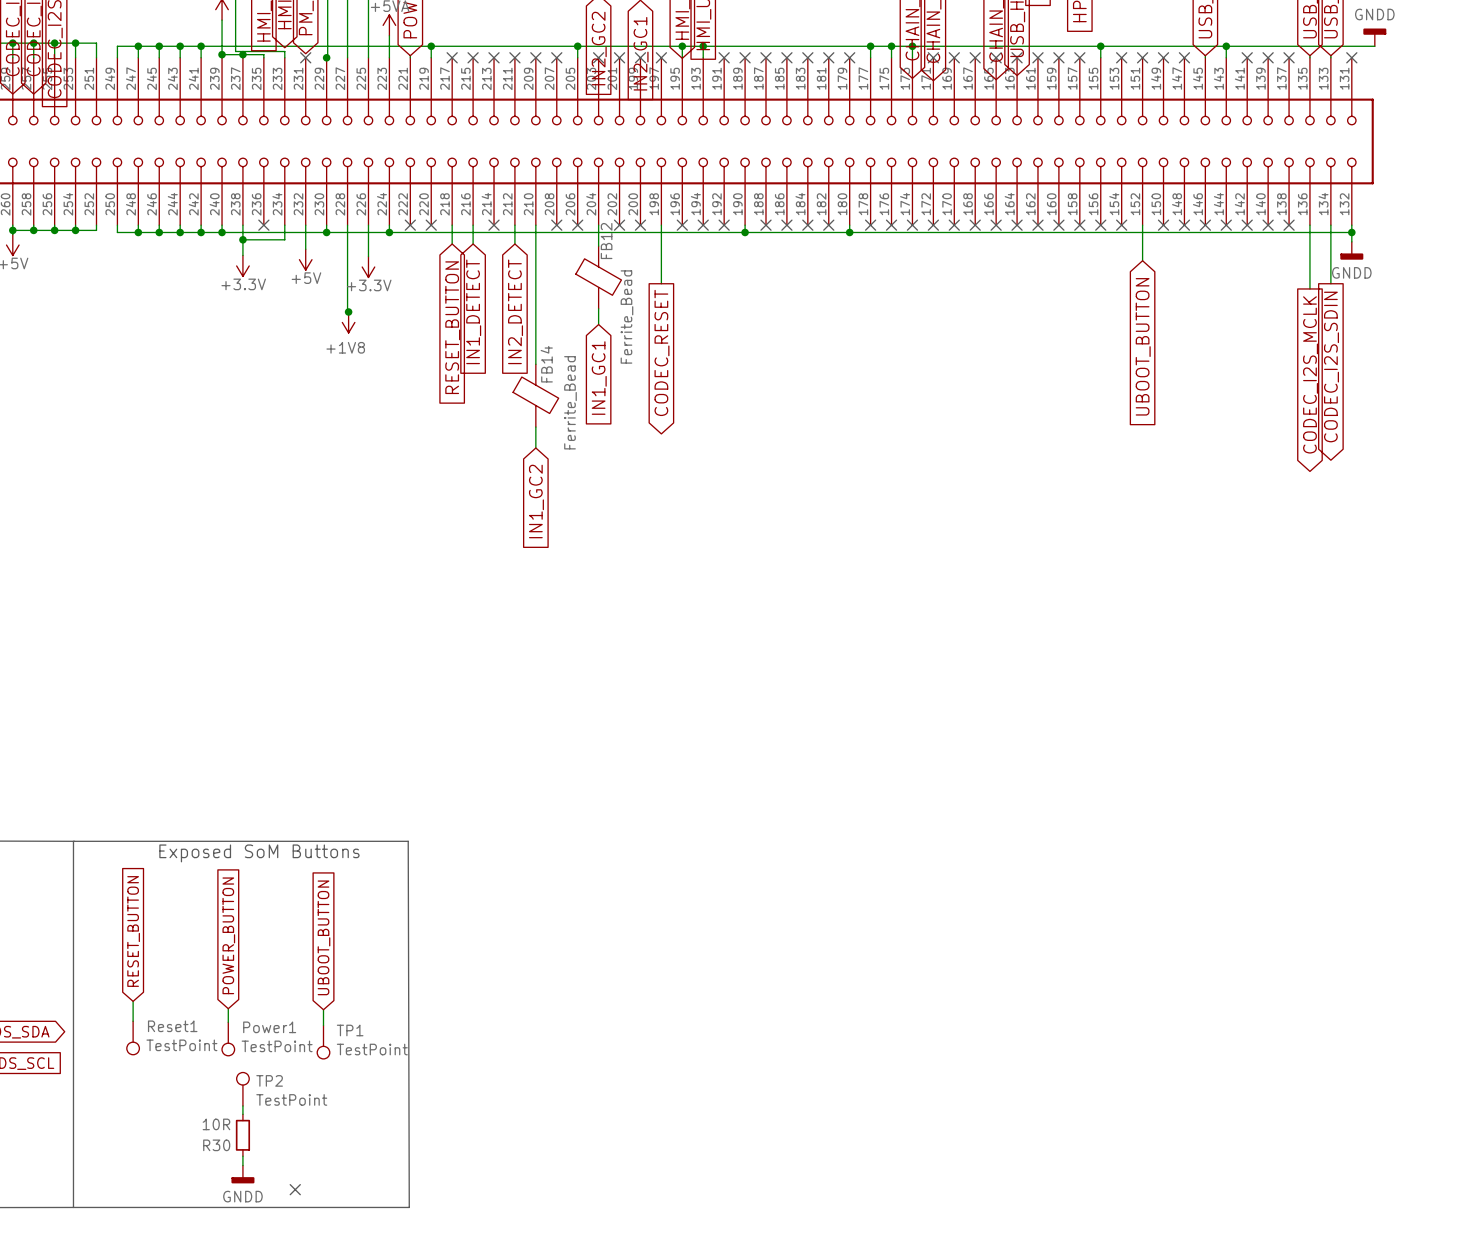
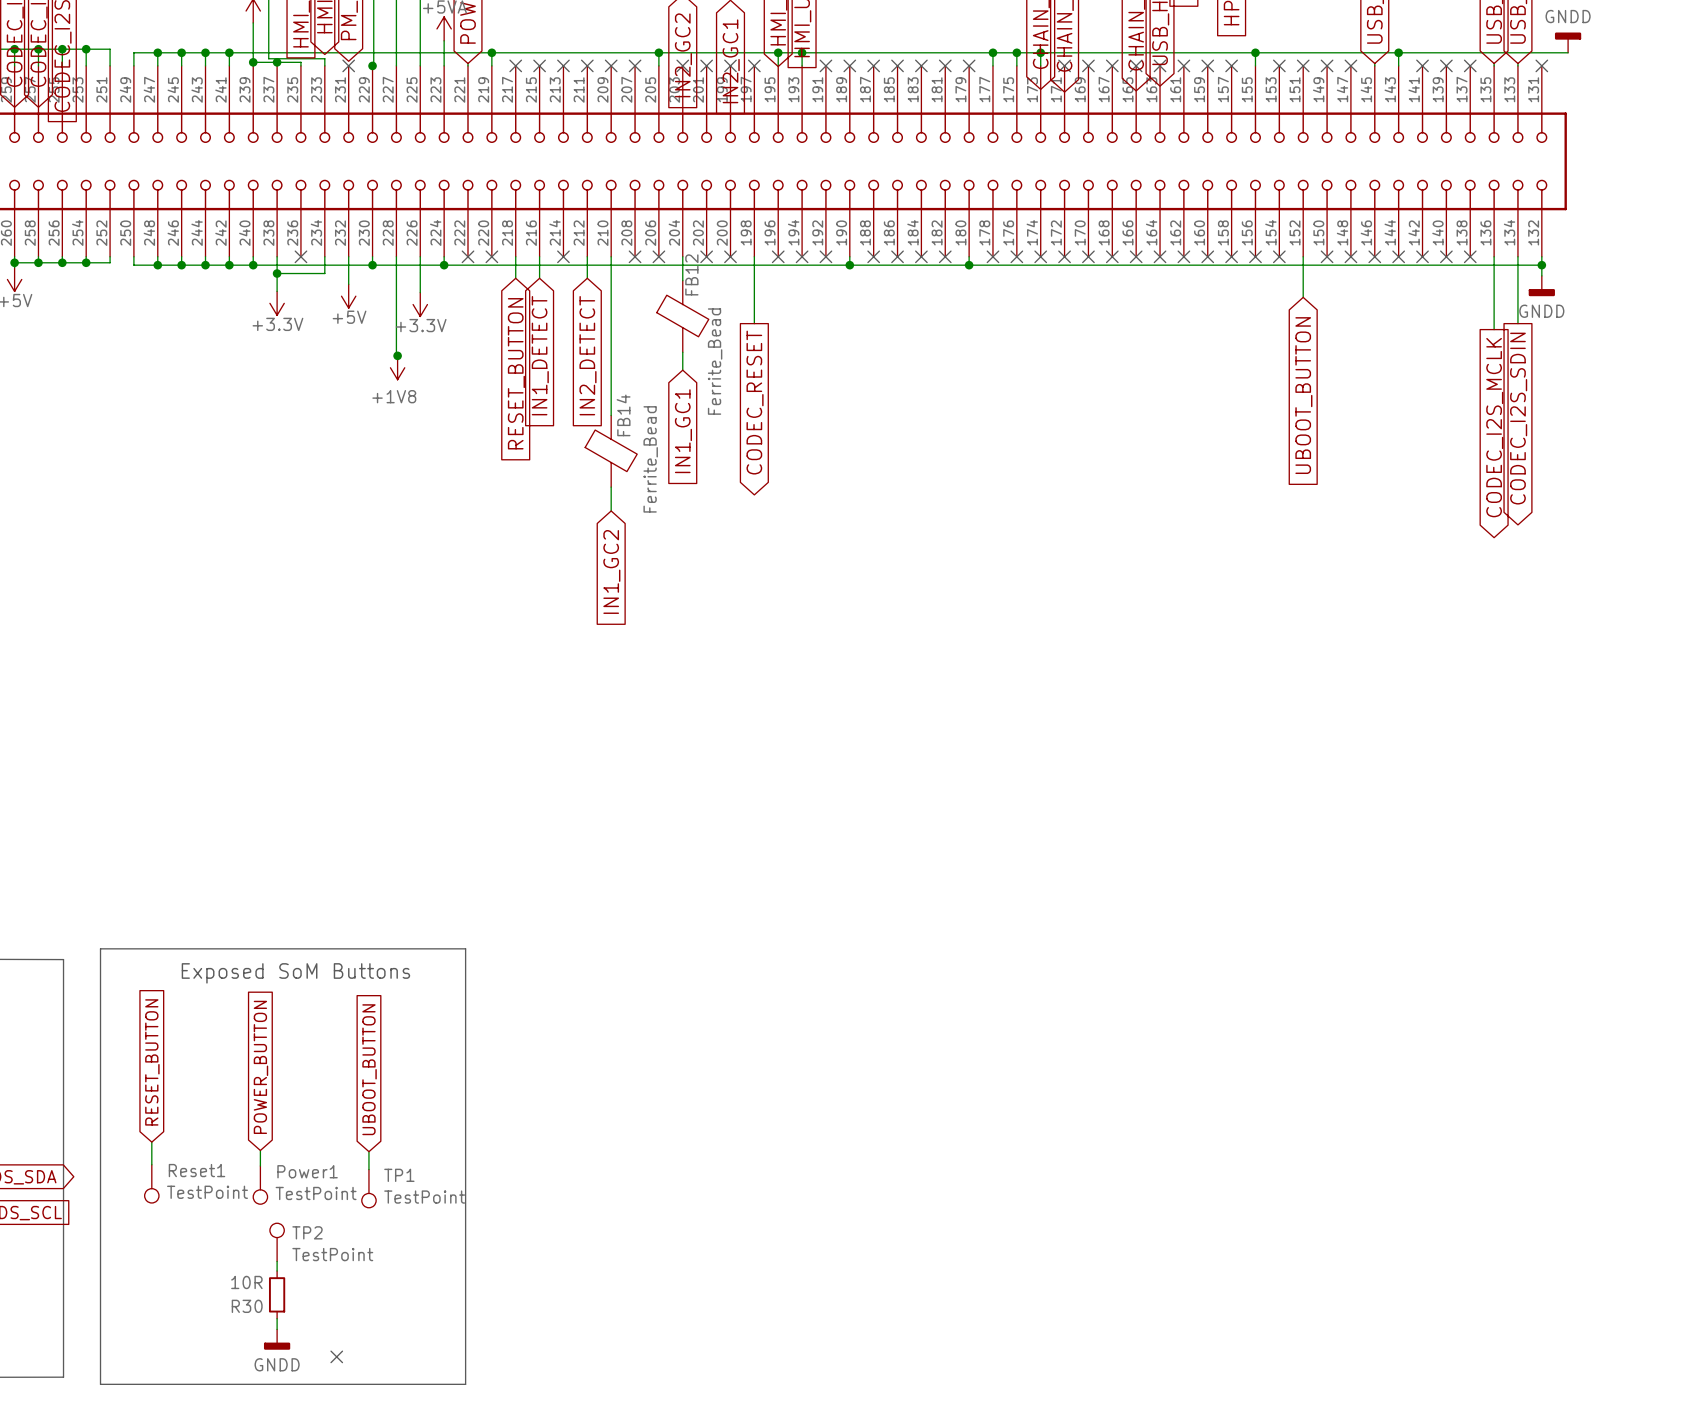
line: none -> (100, 948) (100, 1384) (465, 1384) (465, 948) (100, 948)
line: (55, 841) (408, 841) (409, 1207) (55, 1207) -> (63, 959) (63, 1377)
line: (73, 841) (73, 1207) -> none

